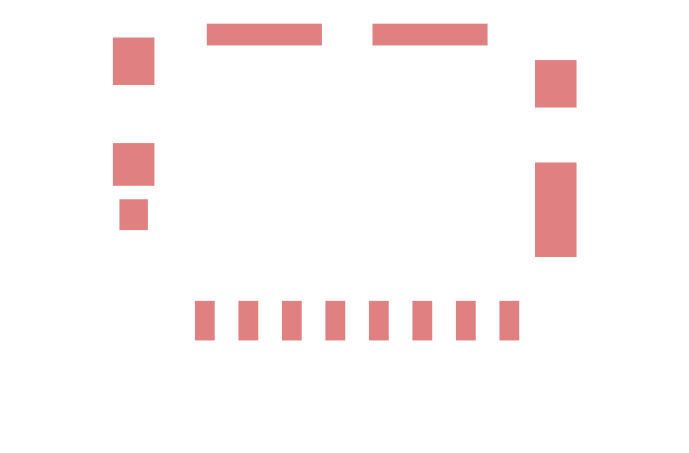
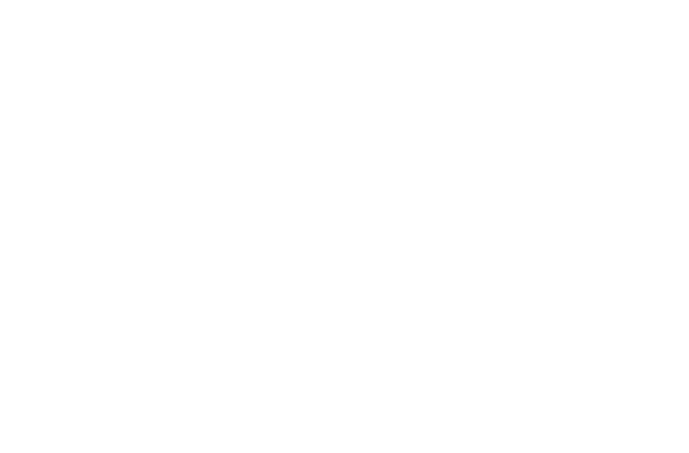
part: (344, 182) -> none

